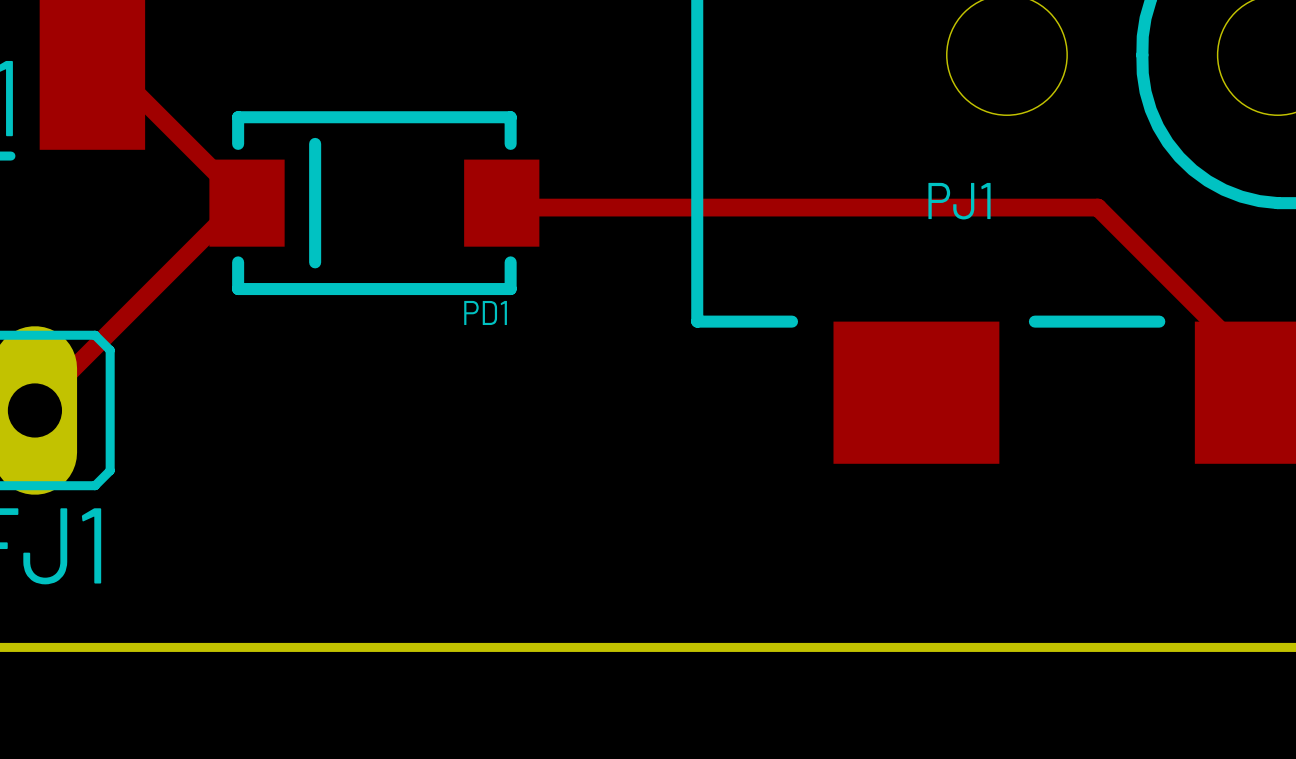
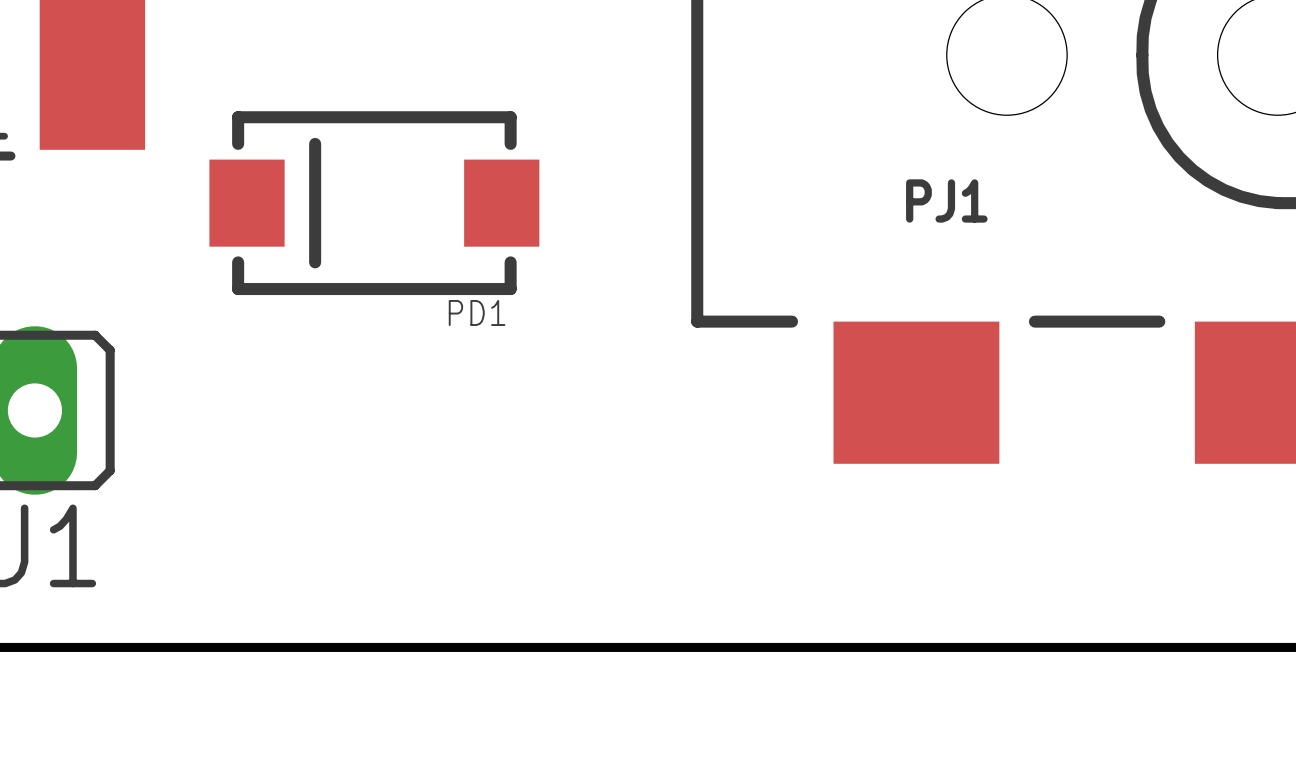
top track: (92, 55) (95, 52) (242, 199) -> none
top track: (242, 199) (38, 403) (34, 410) -> none
top track: (501, 203) (503, 207) (1097, 207) (1277, 386) (1277, 392) -> none

